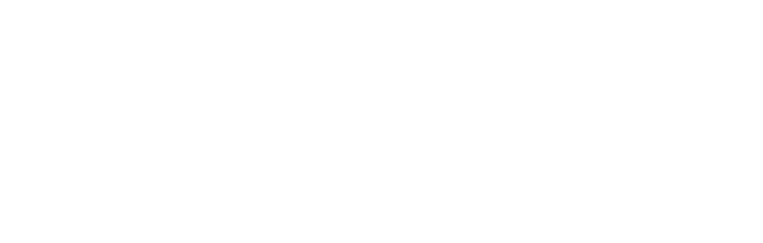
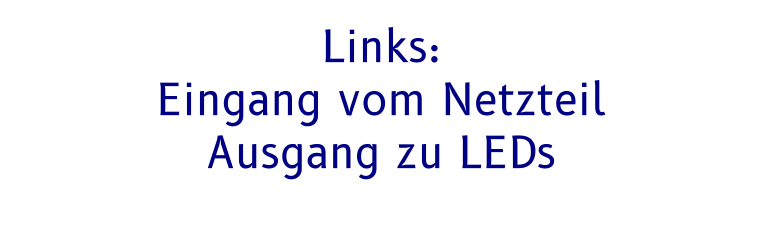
text: none -> Links: (381, 44)
text: none -> Eingang vom Netzteil (382, 103)
text: none -> Ausgang zu LEDs (380, 157)

